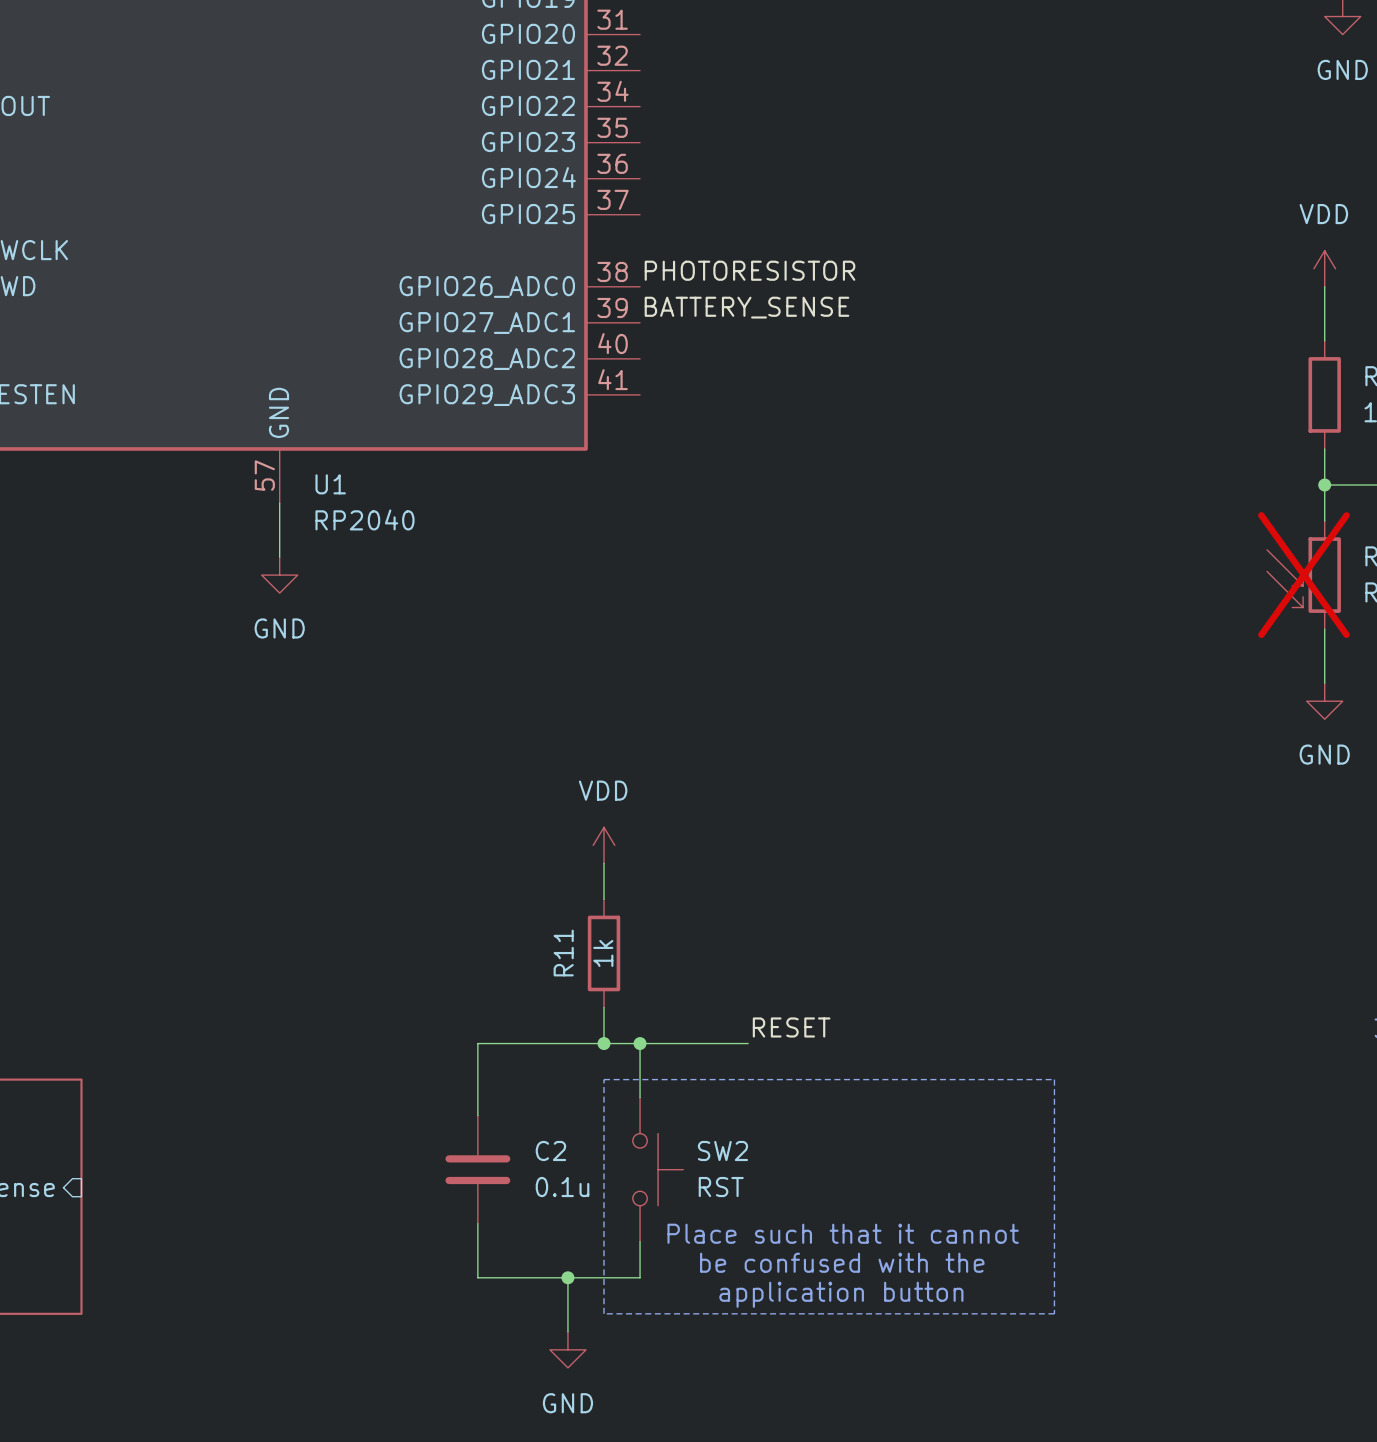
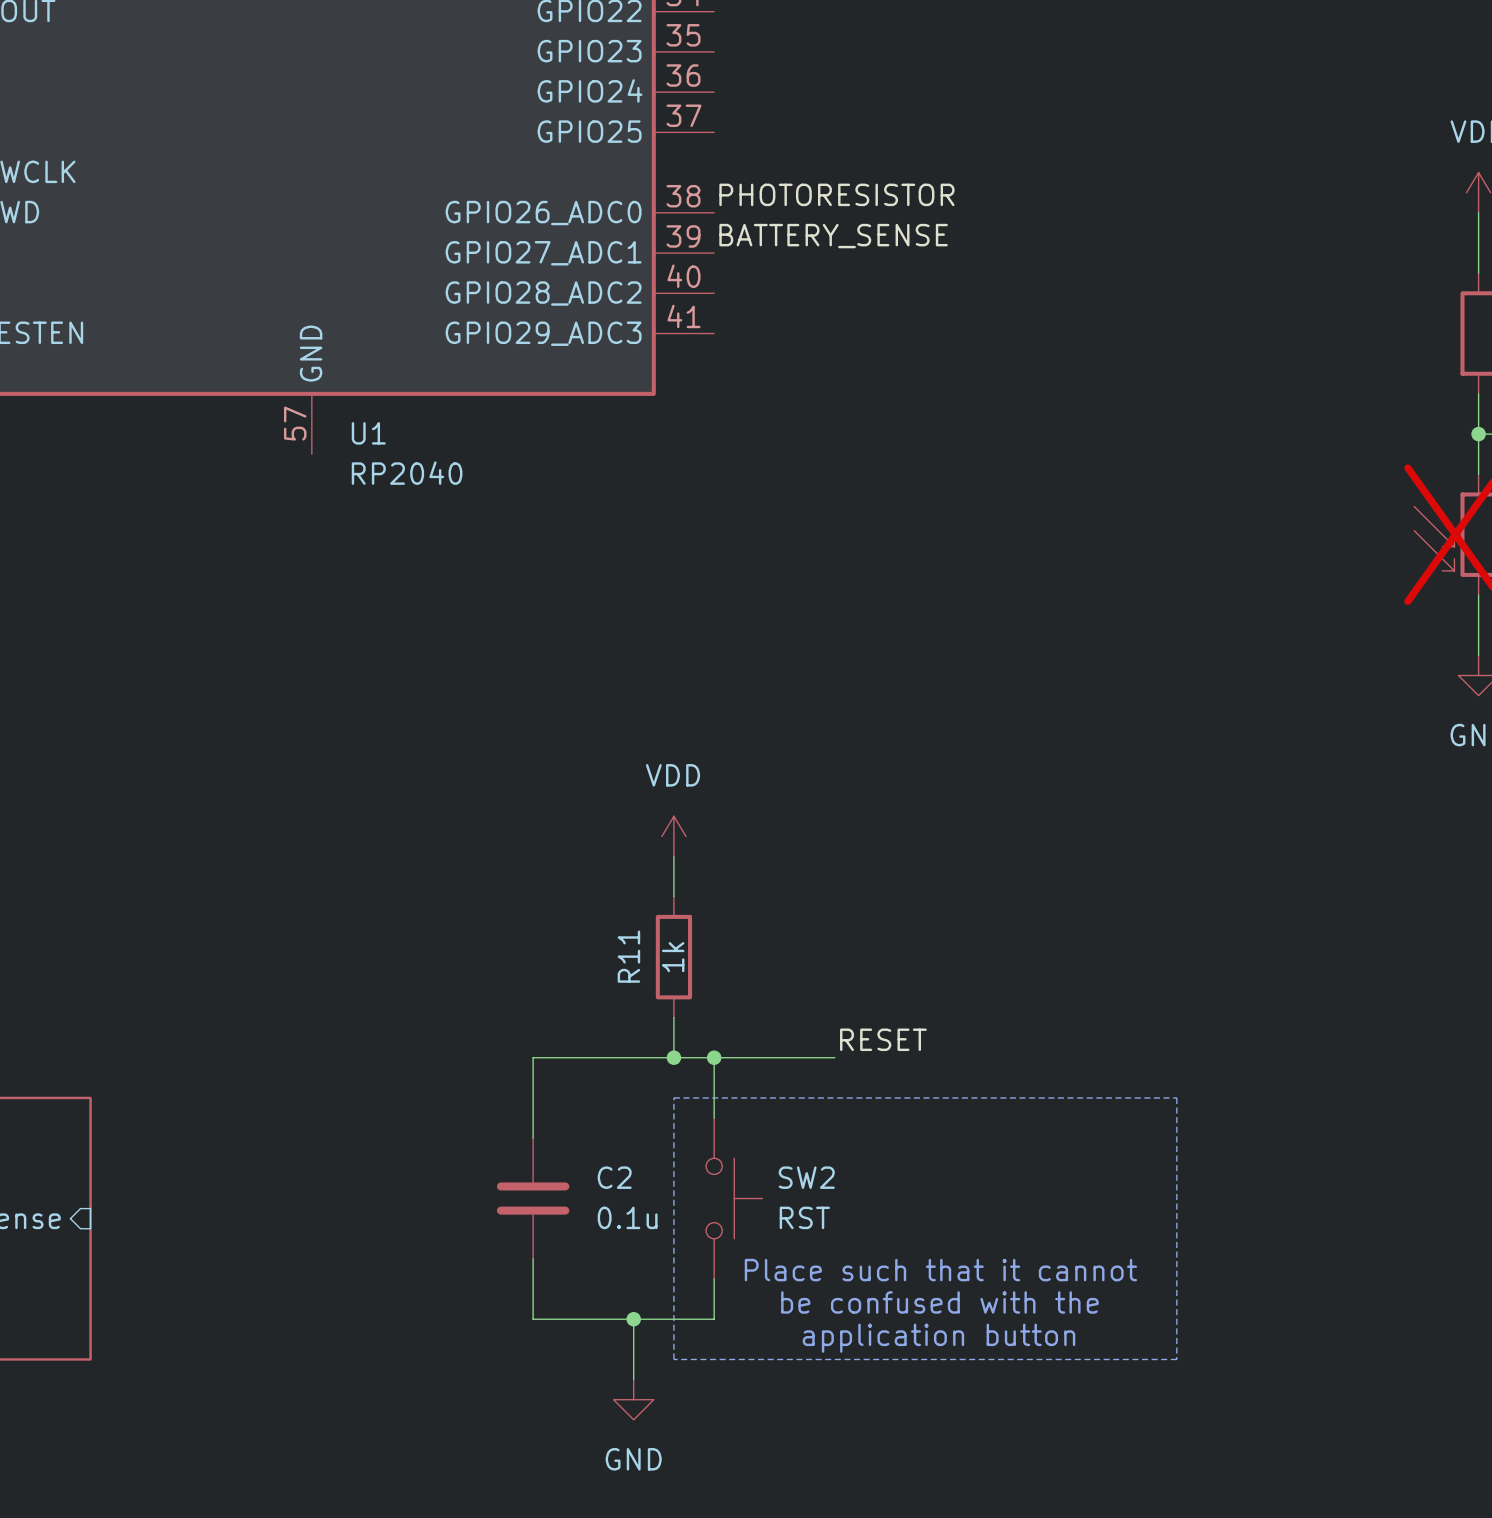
wire: (279, 503) (279, 557) -> none
power symbol: GND (279, 575) -> none

